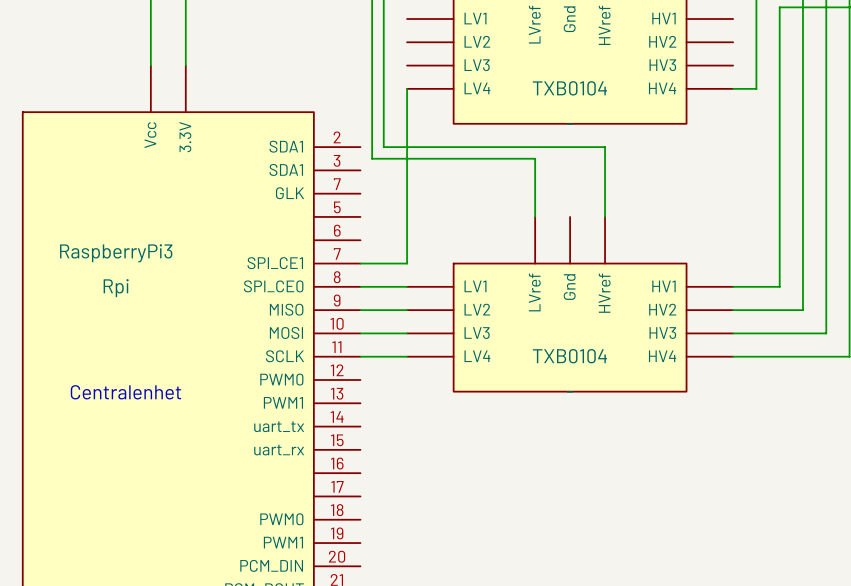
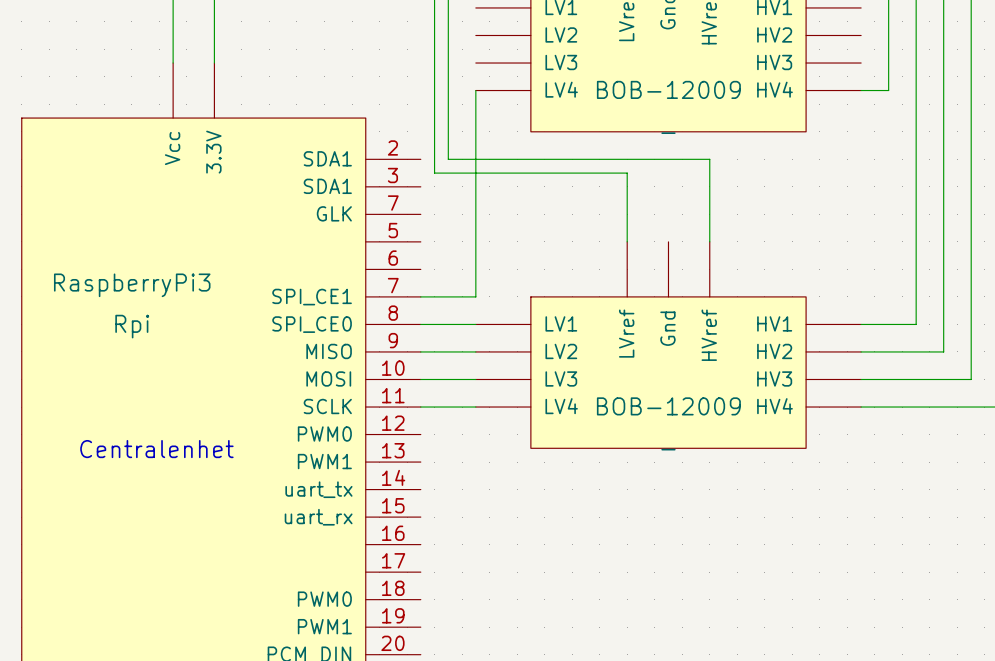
part value: TXB0104 (569, 88) -> BOB-12009 (668, 89)
part value: TXB0104 (569, 356) -> BOB-12009 (668, 406)

